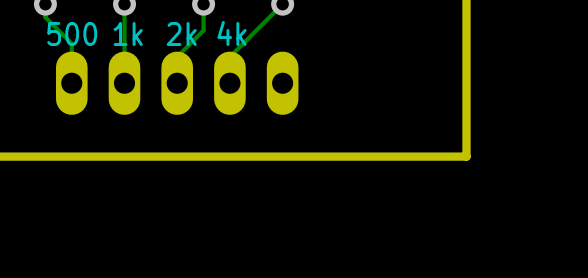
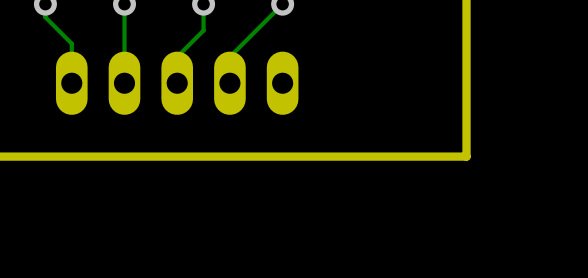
text: 500 (72, 33) -> none
text: 1k (128, 33) -> none
text: 2k (181, 33) -> none
text: 4k (231, 33) -> none

